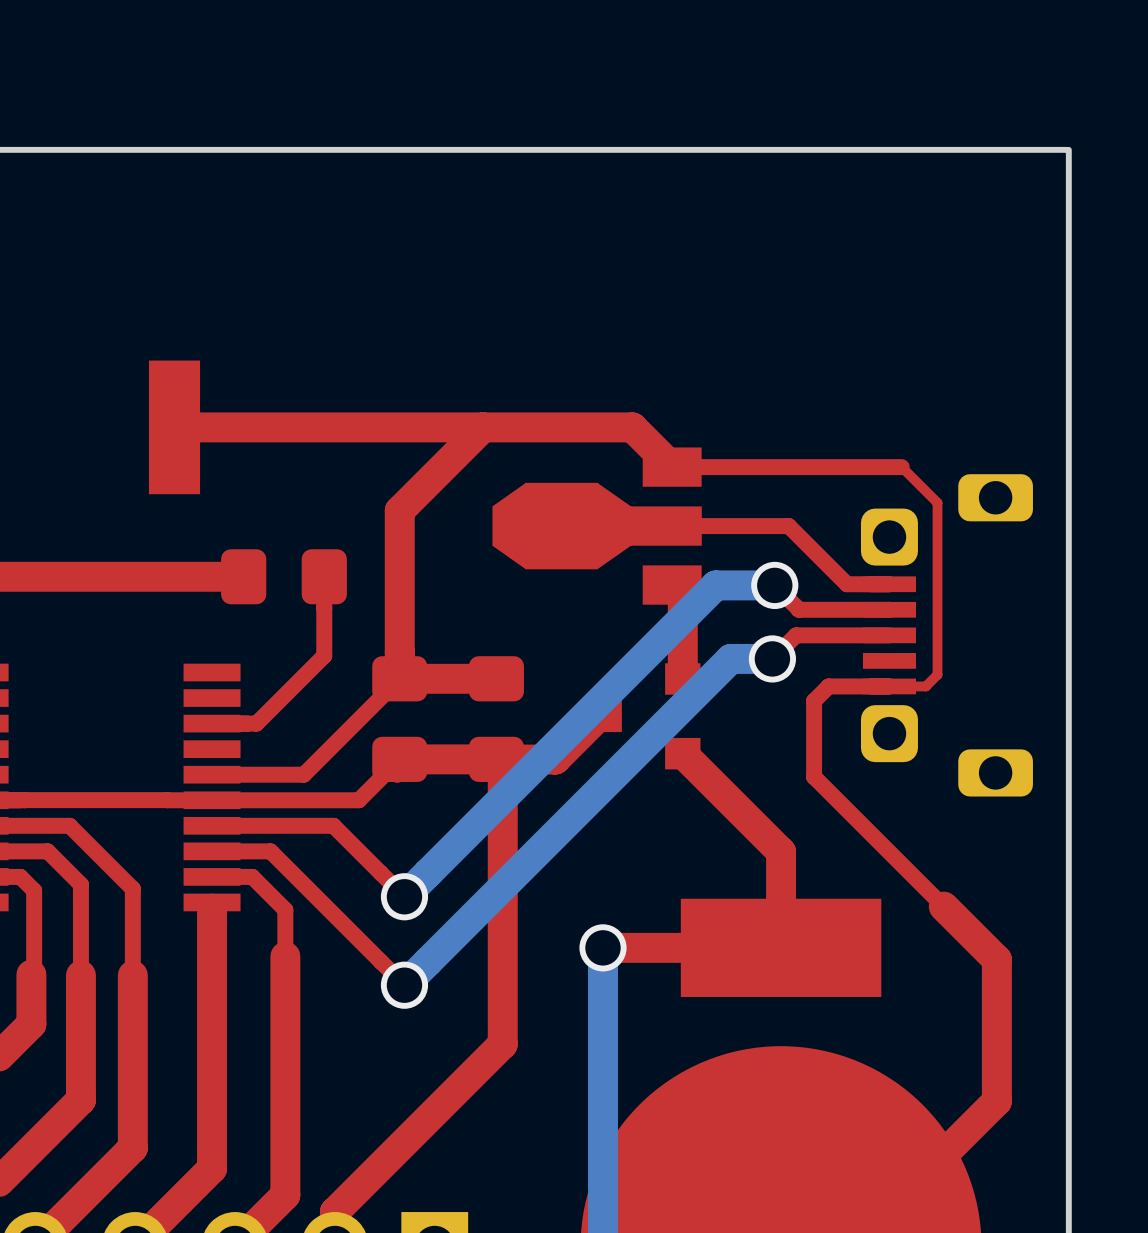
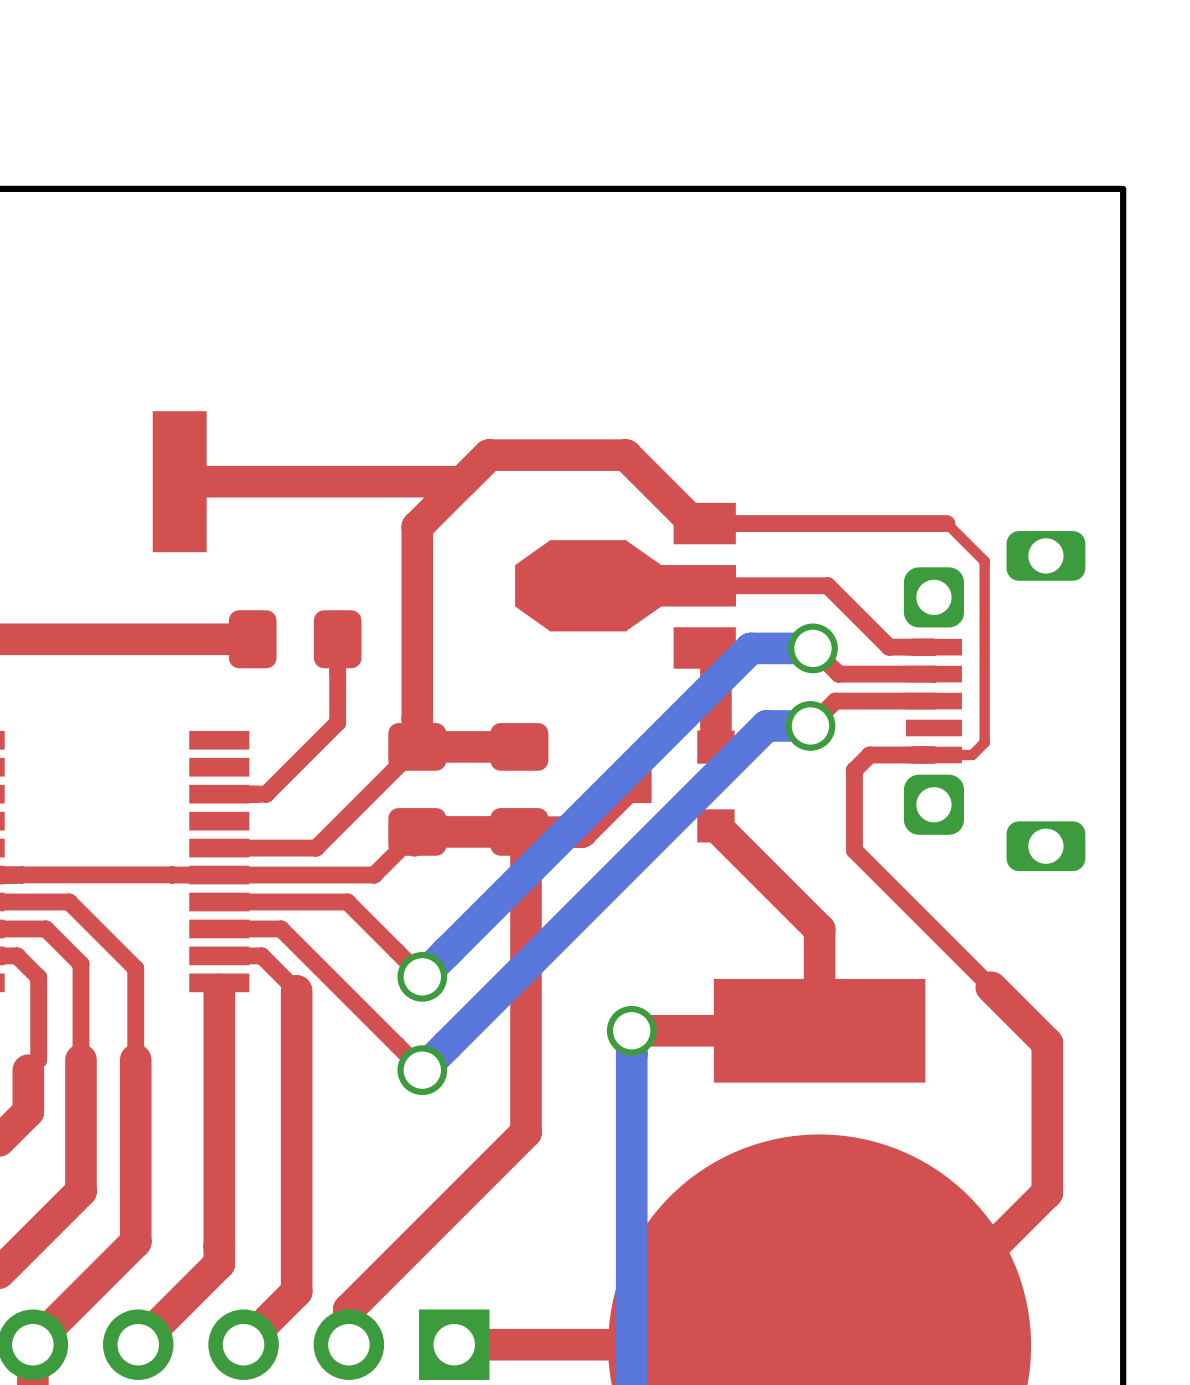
top track: (442, 427) (632, 427) (672, 467) -> none
top track: (483, 427) (399, 510) -> (694, 523) (625, 455) (489, 455) (417, 526) (417, 569)
top track: (34, 890) (34, 968) -> (31, 970) (38, 977) (38, 1059) (28, 1070) (28, 1111)
top track width: thin (285, 909) (285, 956) -> thick (296, 990) (296, 1039)
top track: (31, 974) (31, 1024) -> none

